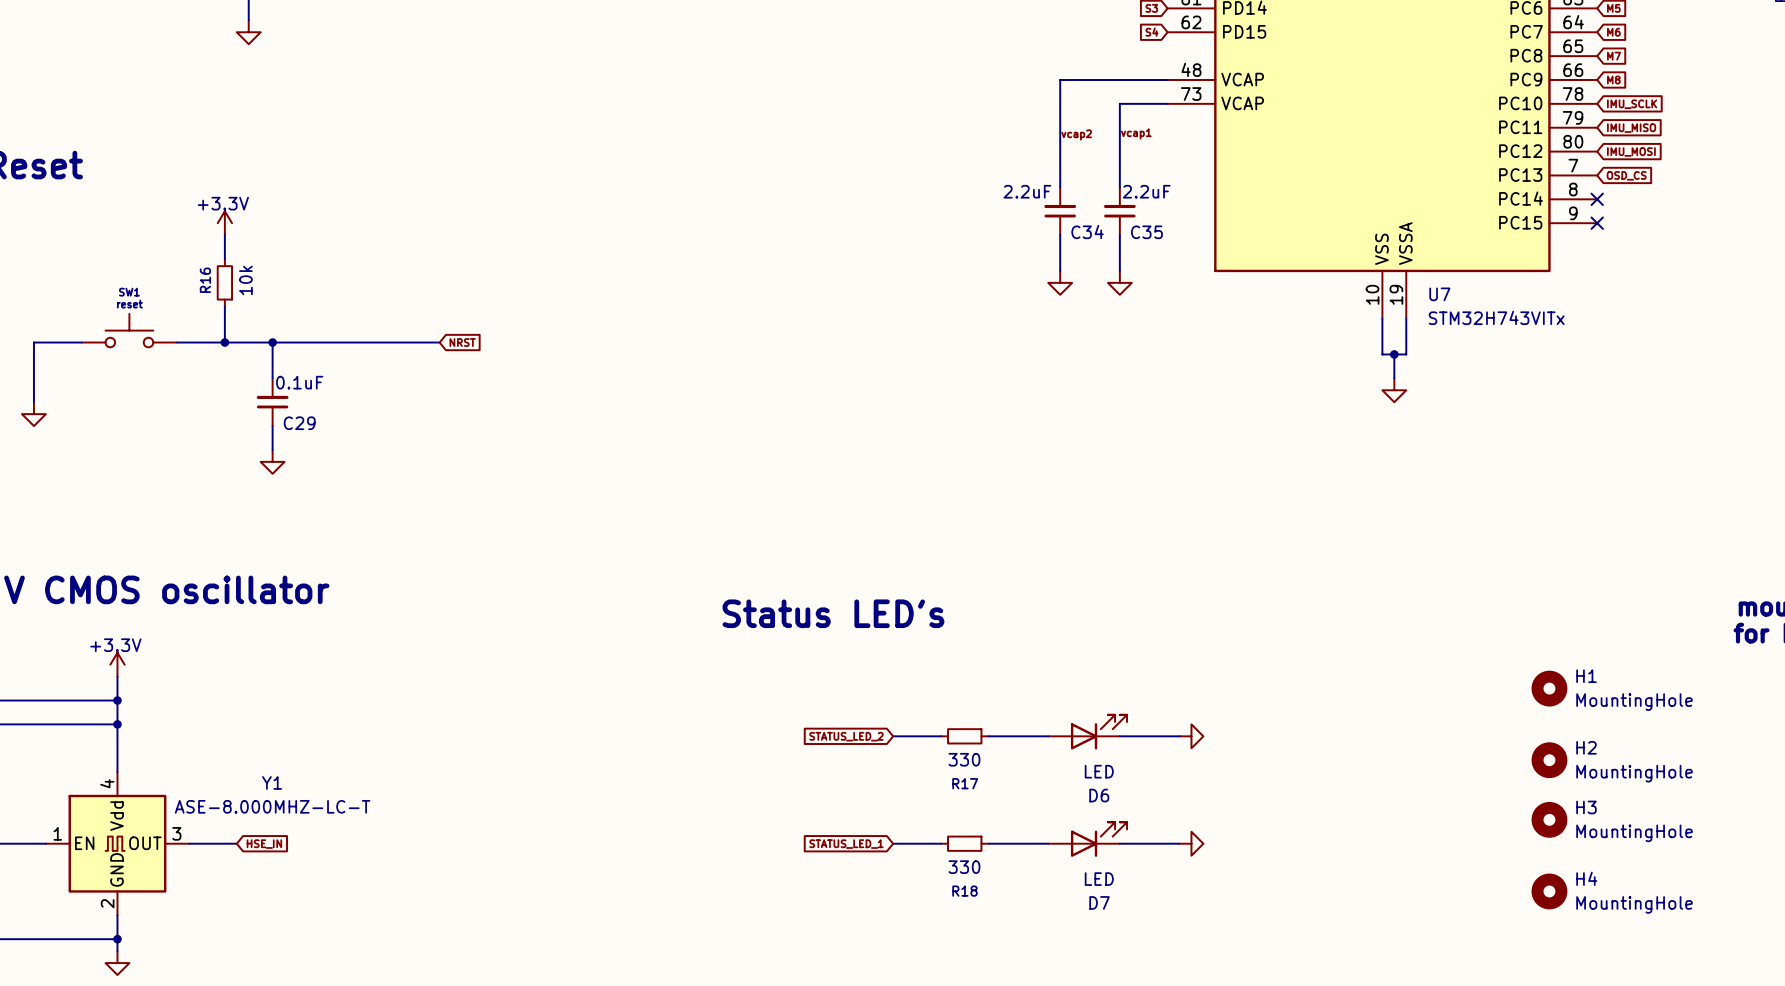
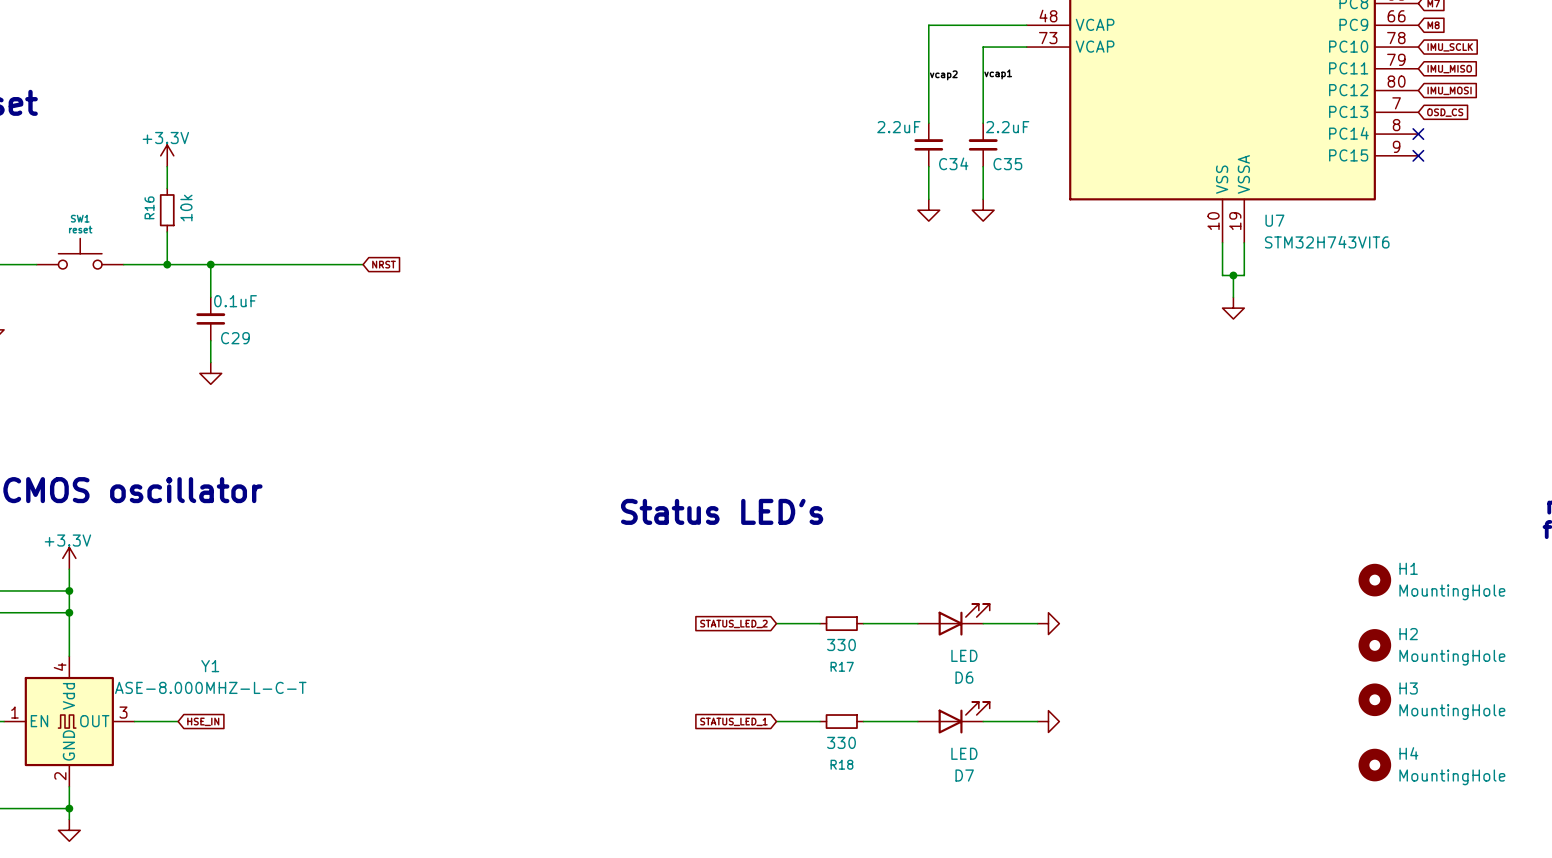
U7 value: STM32H743VITx (1496, 317) -> STM32H743VIT6 (1327, 242)
Y1 value: ASE-8.000MHZ-LC-T (272, 806) -> ASE-8.000MHZ-L-C-T (210, 687)

